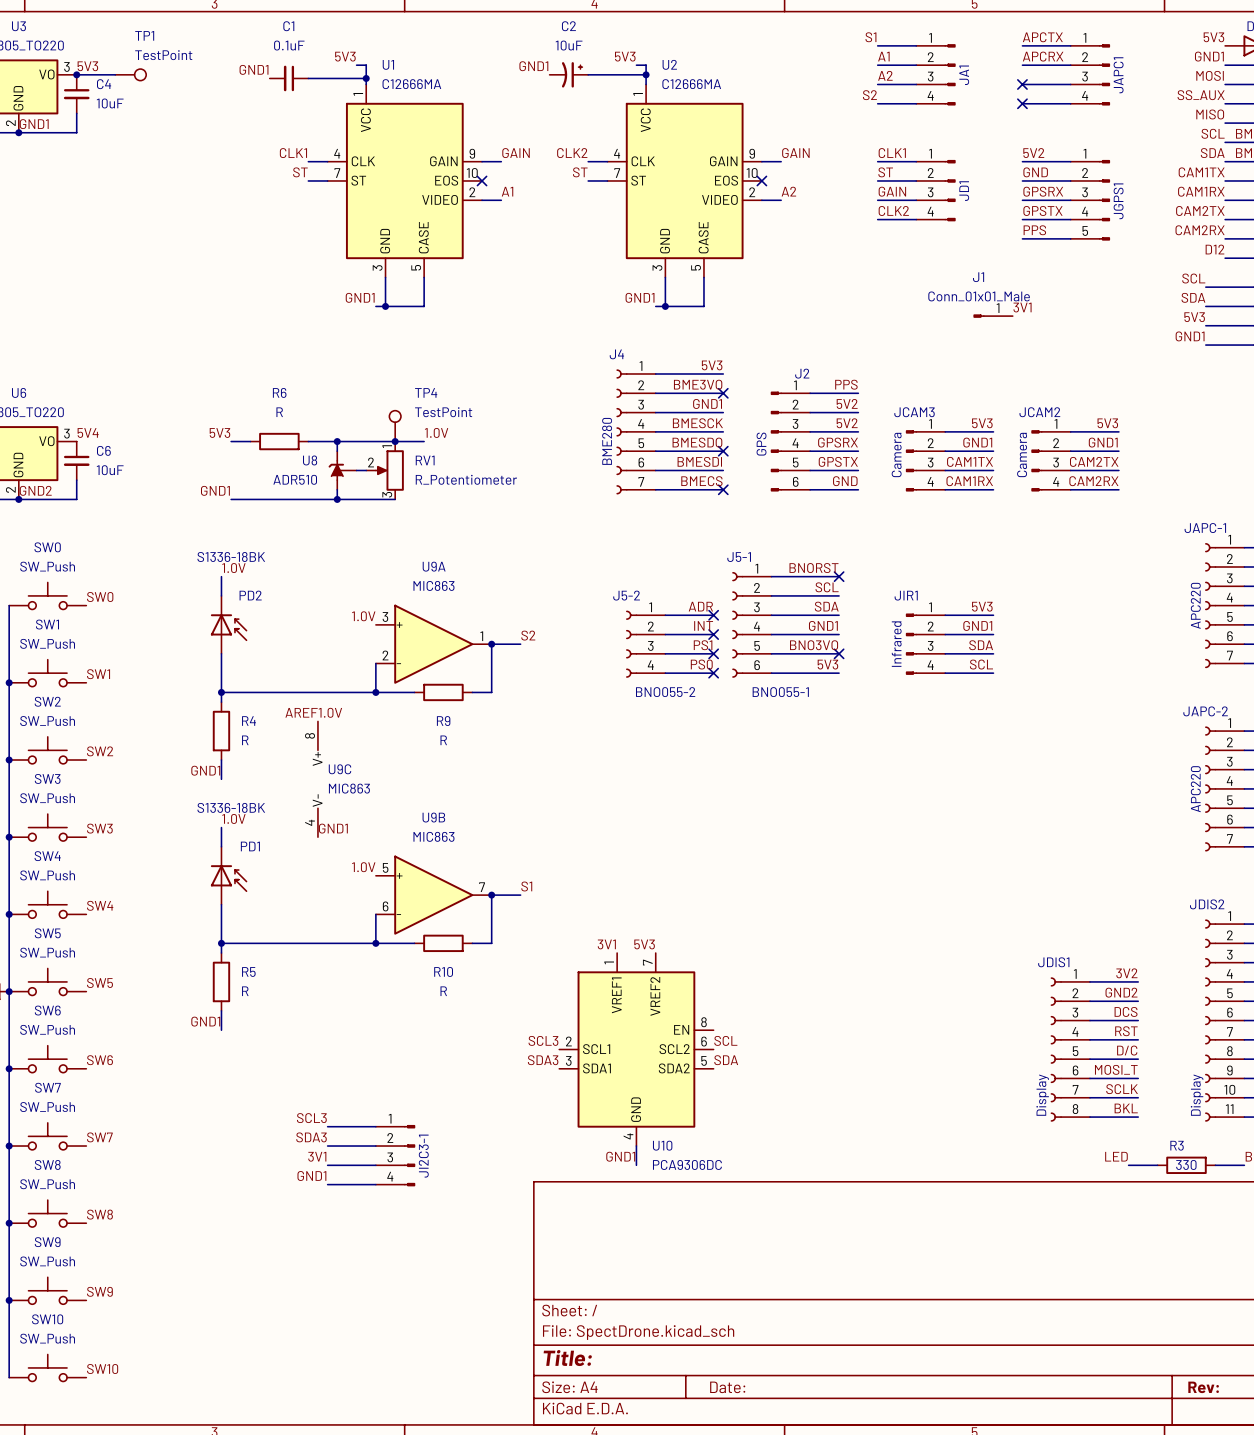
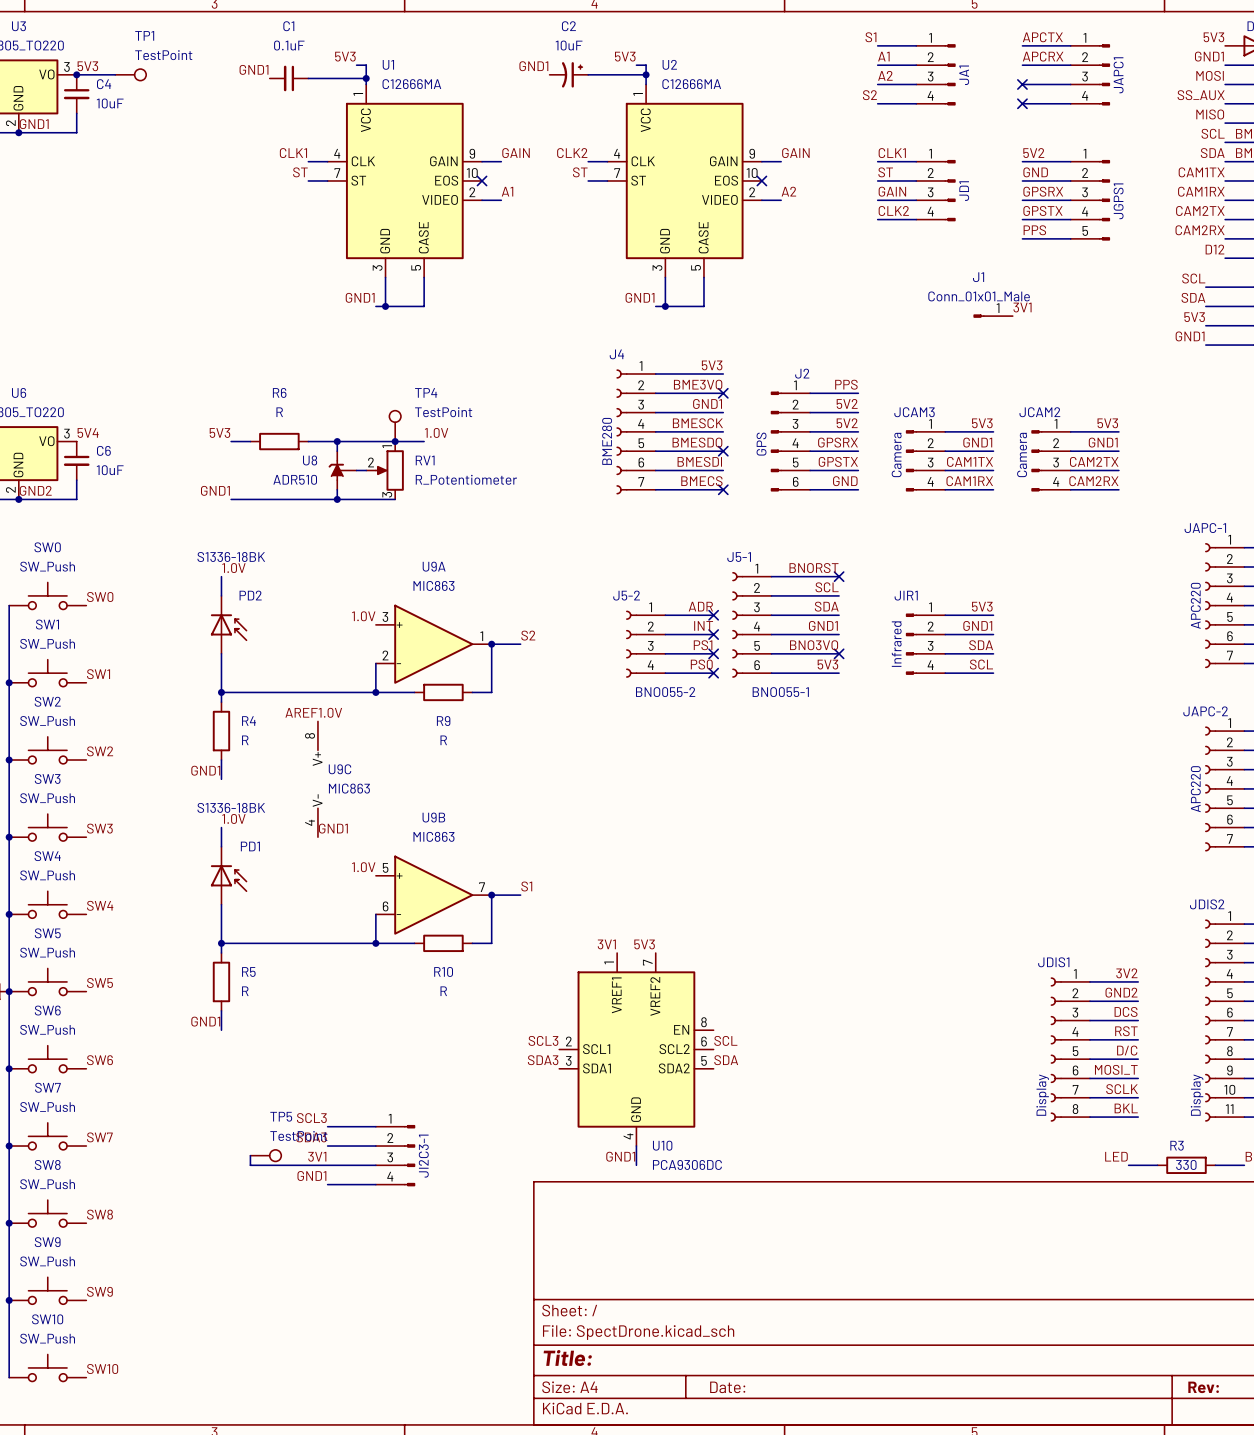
wire: none -> (250, 1155) (250, 1165) (327, 1165)
TP5: none -> TestPoint (265, 1155)

